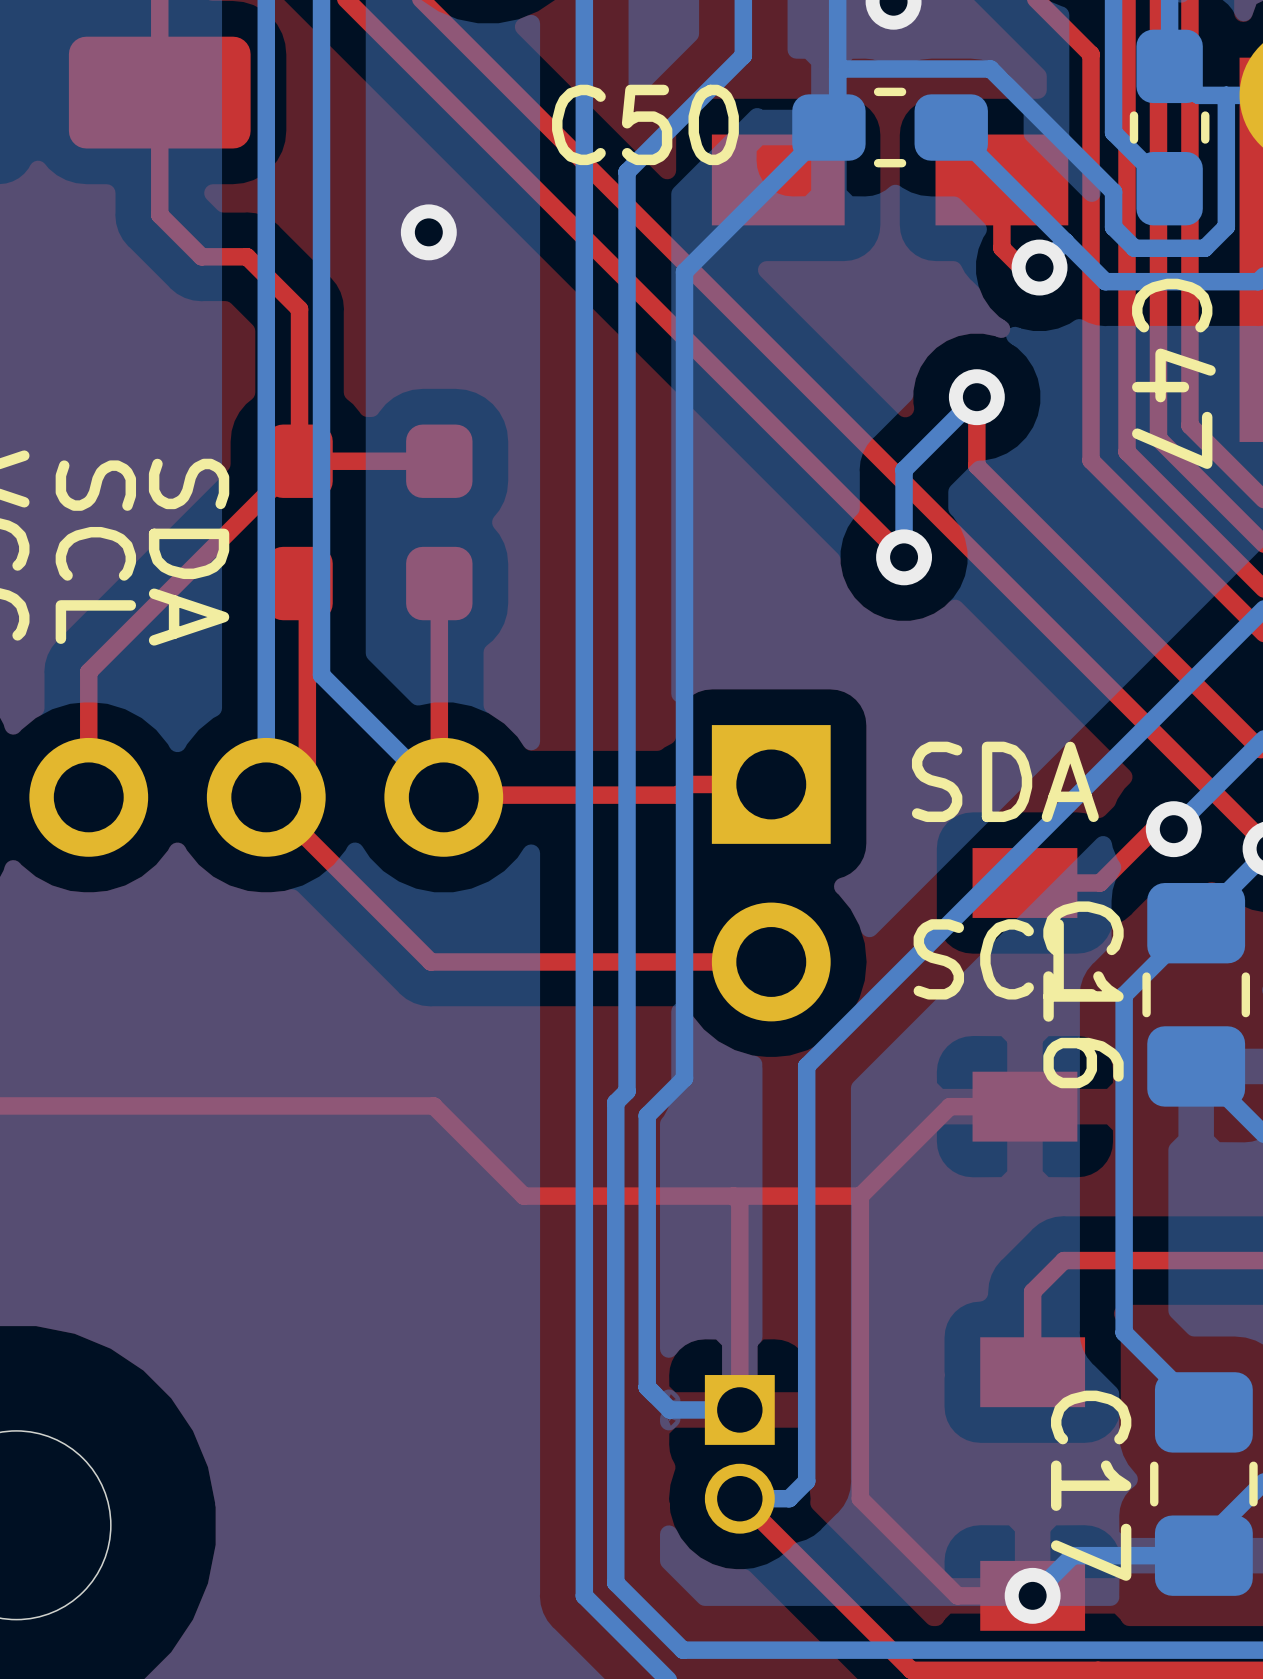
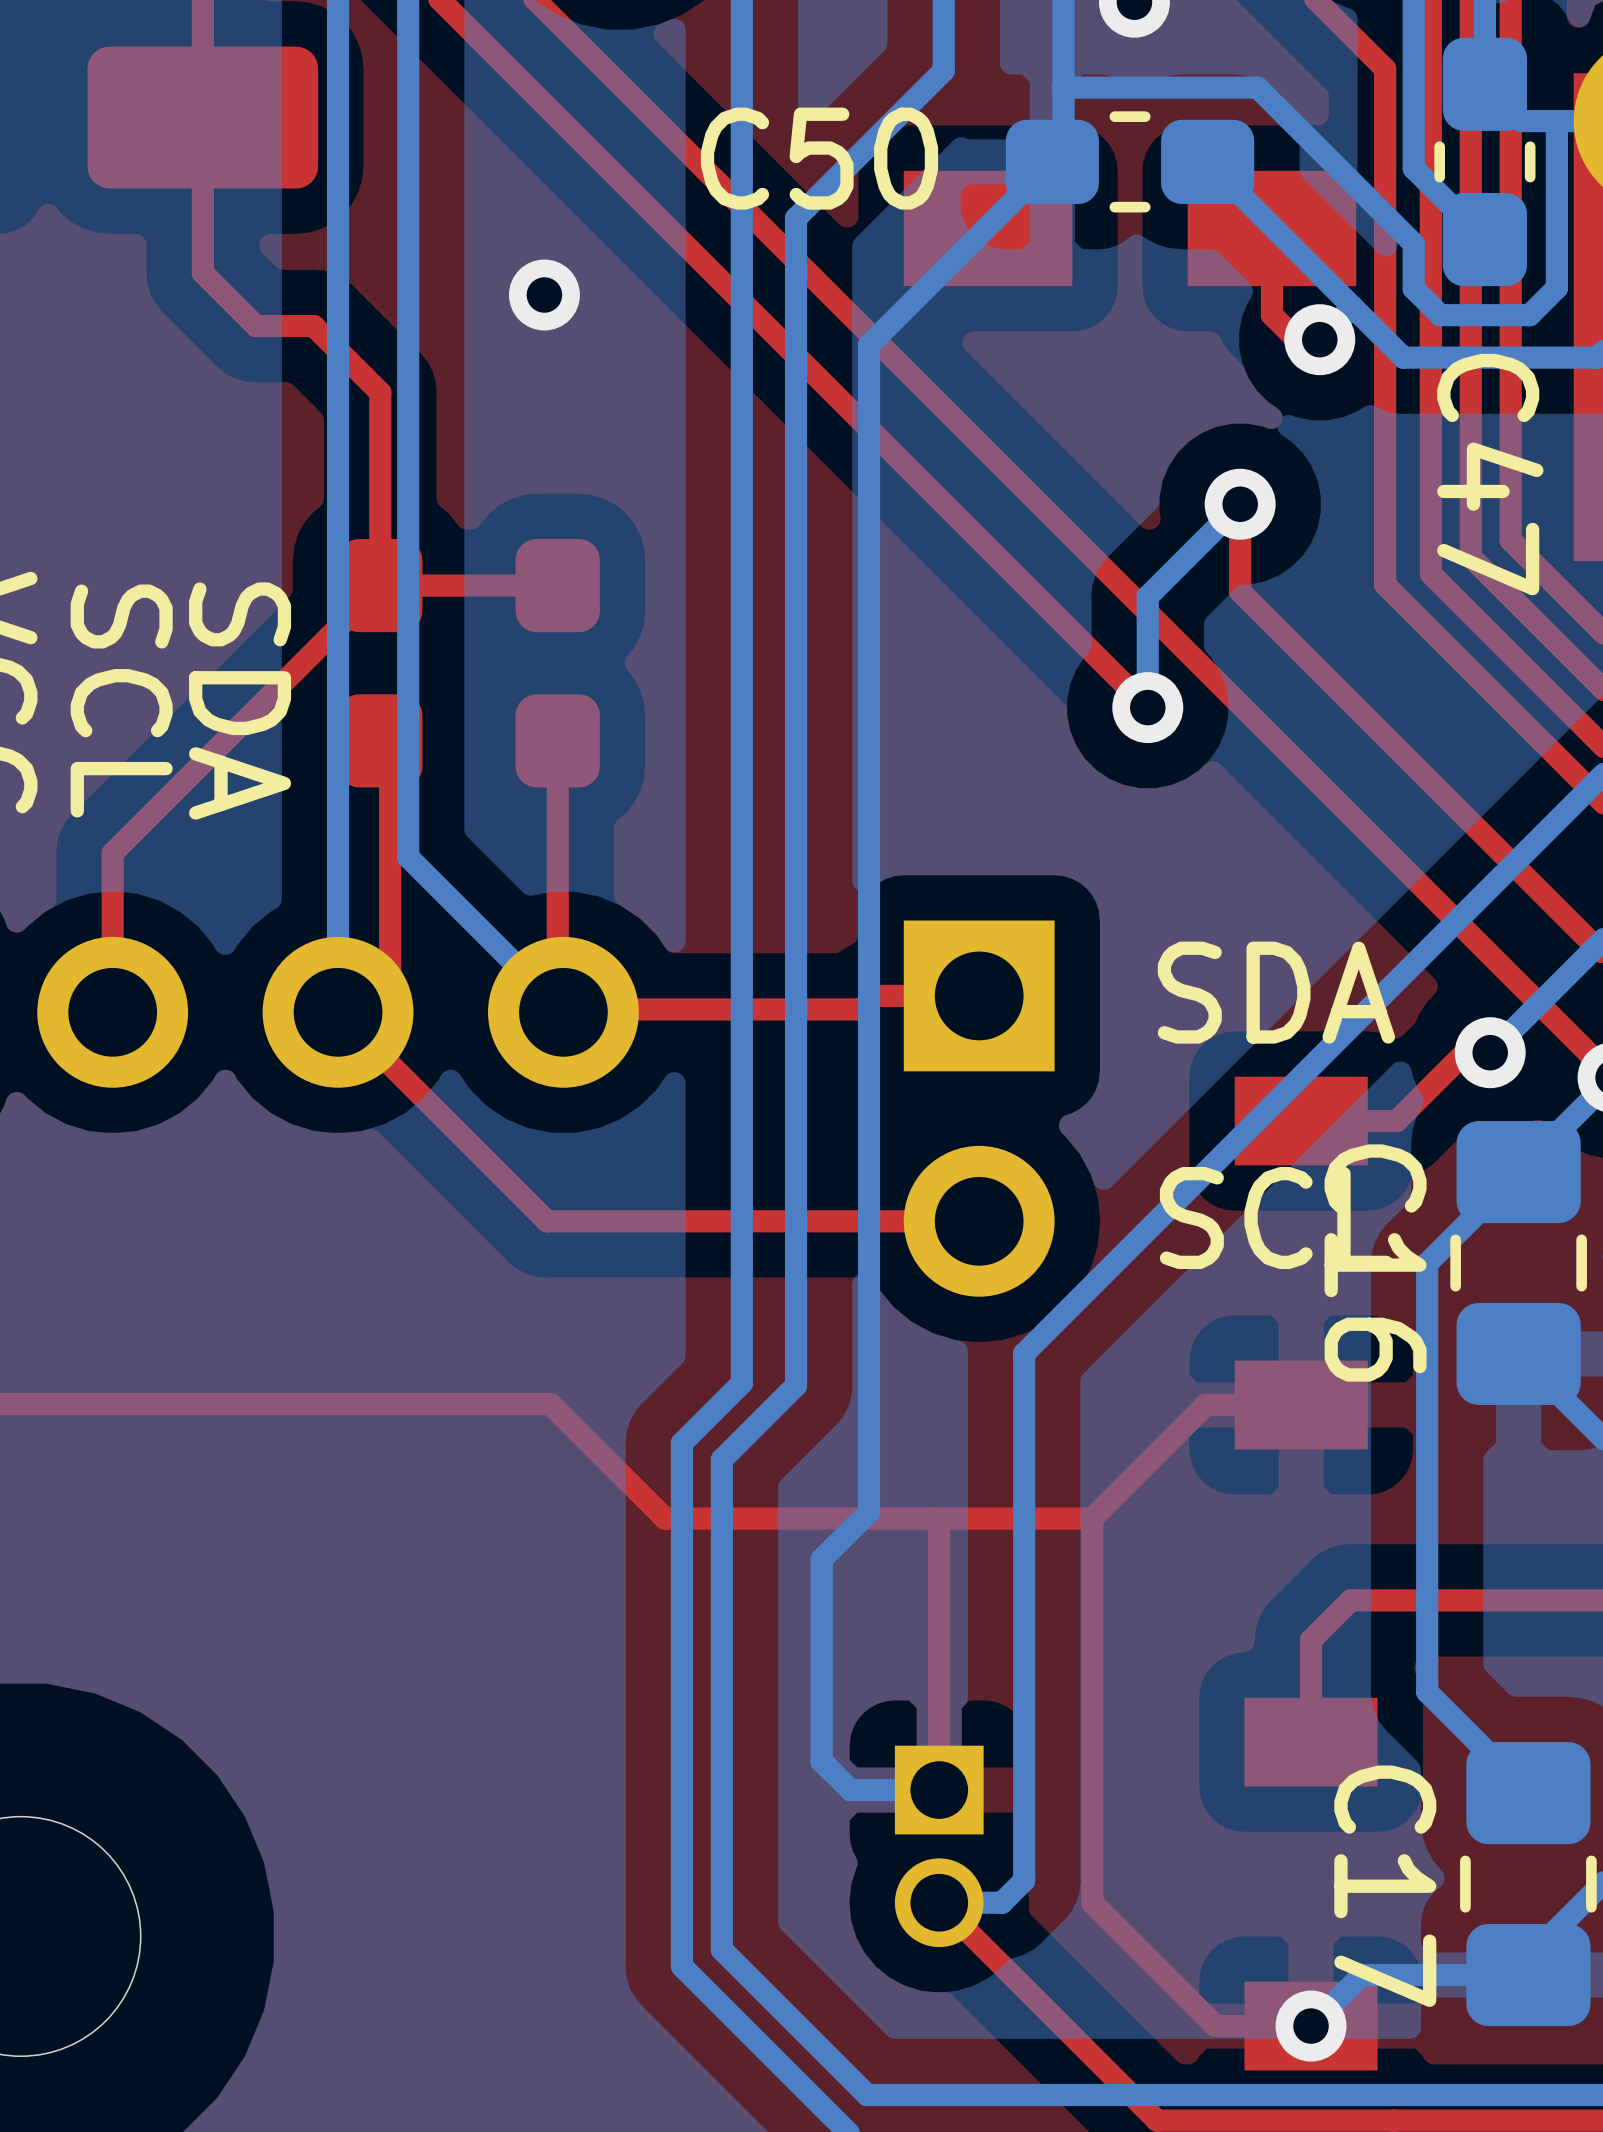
bottom track: (684, 1078) (647, 1115) (647, 1228) -> (869, 1369) (869, 1512) (821, 1559)
bottom track: (584, 1089) (584, 1595) -> (741, 1383) (681, 1443) (681, 1966) (741, 2026)
bottom track: (615, 1102) (615, 1582) -> (781, 1399) (721, 1459) (721, 1949) (781, 2009)

